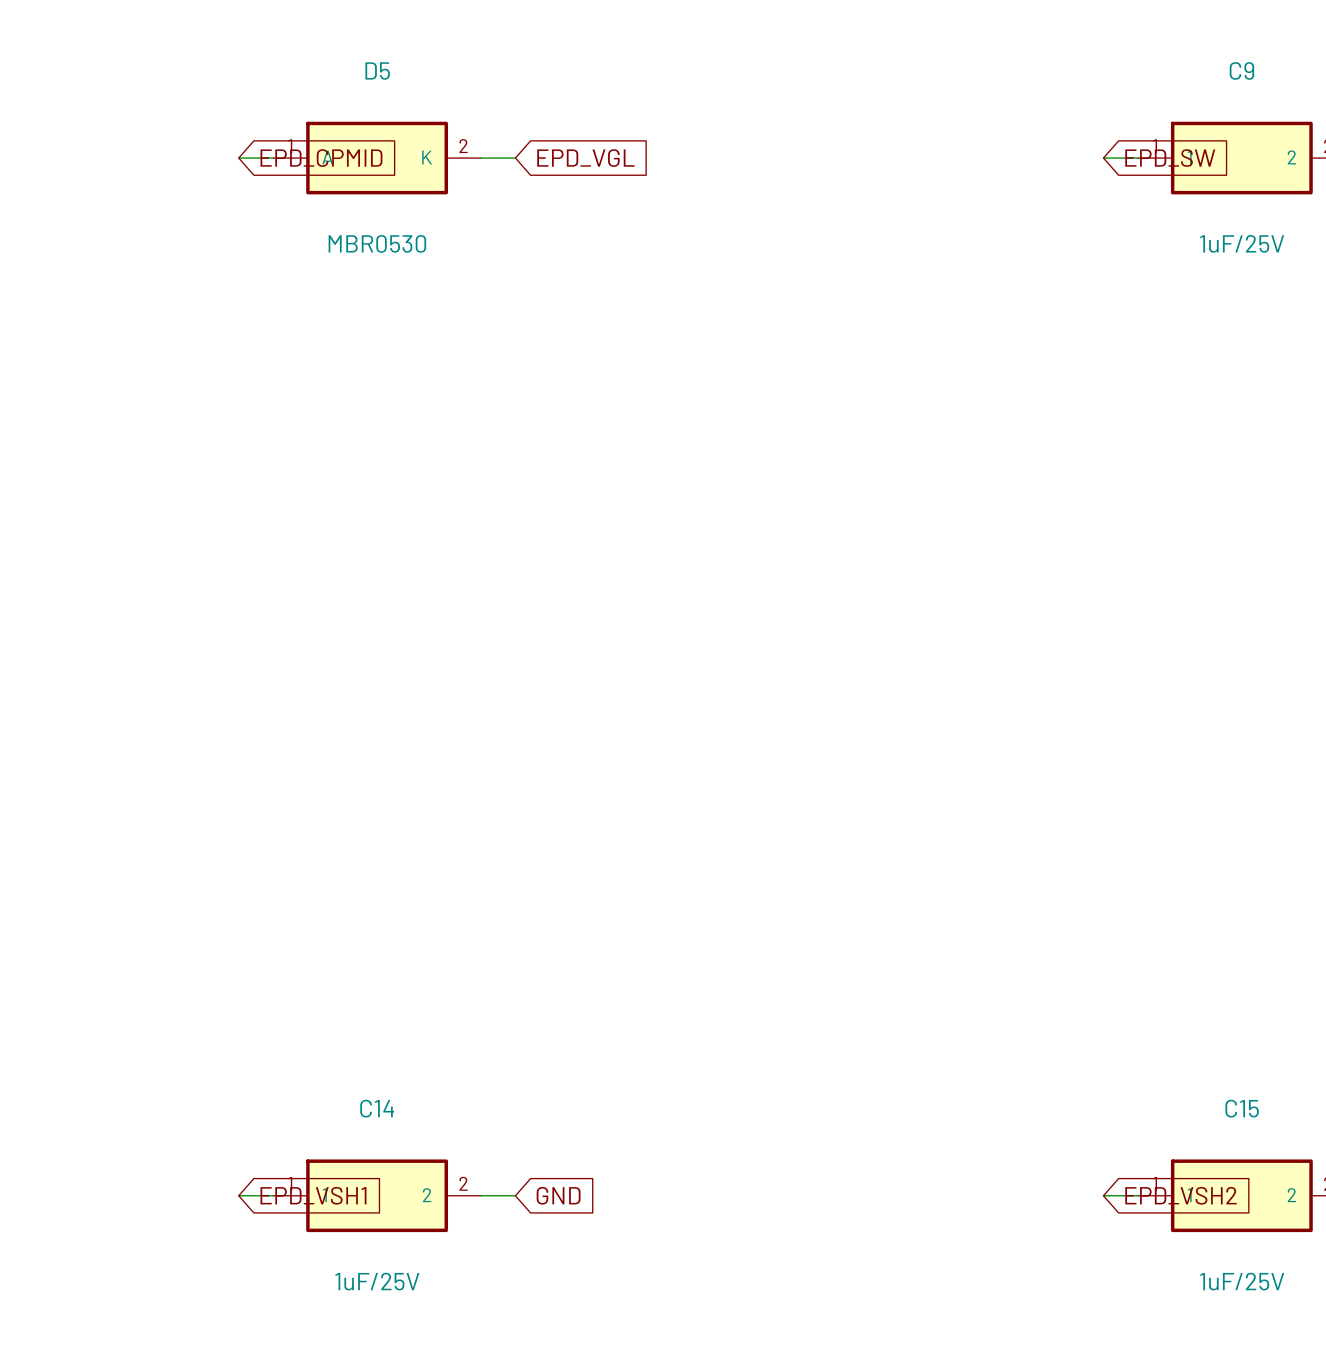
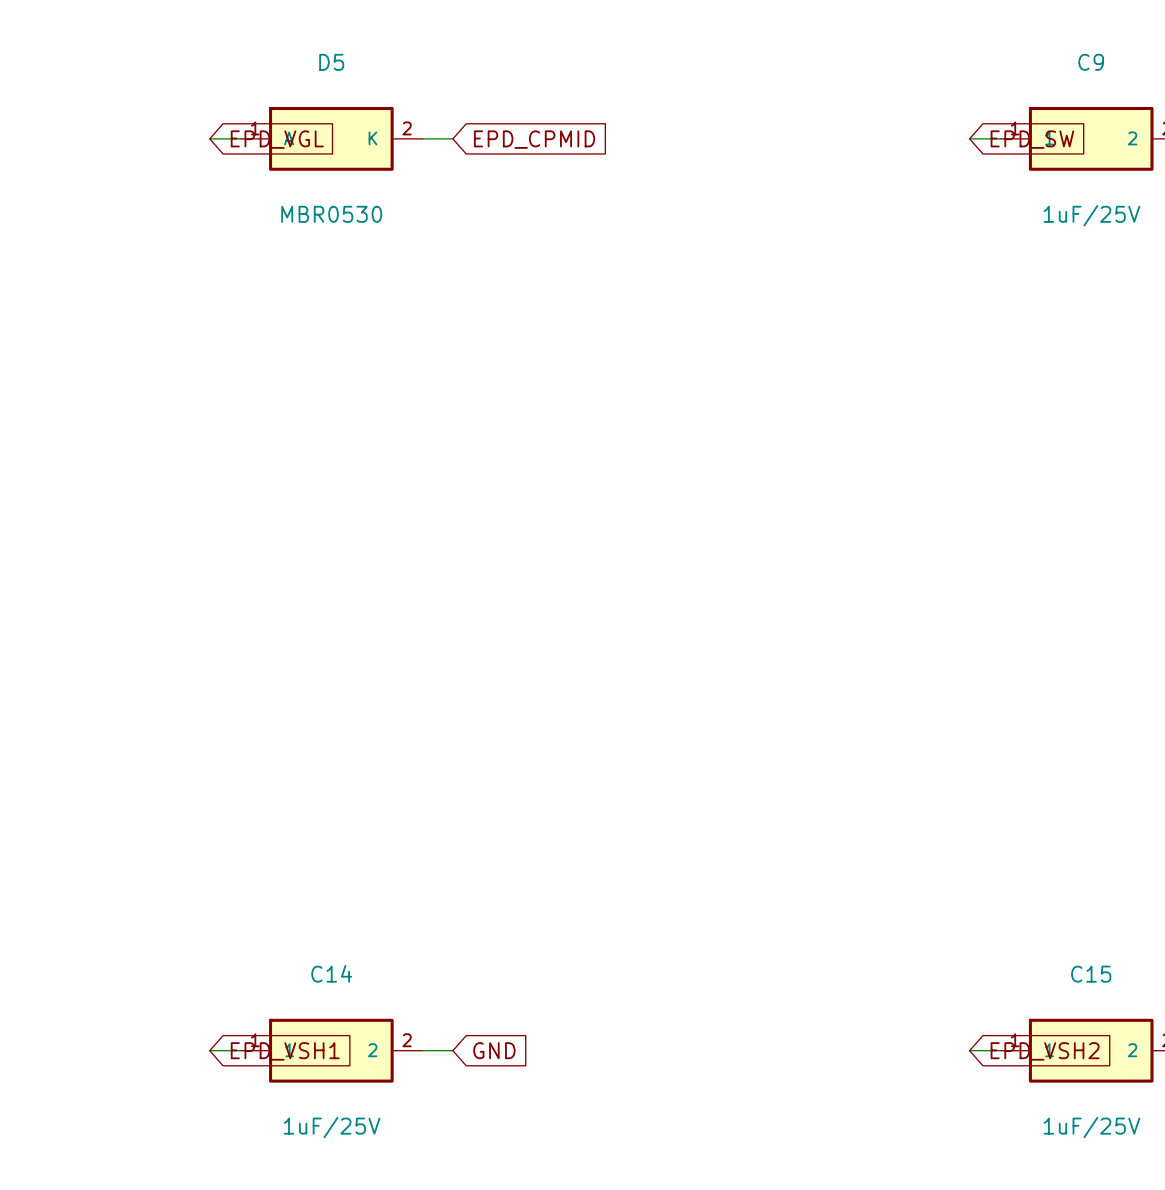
global label: EPD_CPMID (321, 158) -> EPD_VGL (277, 139)
global label: EPD_VGL (585, 158) -> EPD_CPMID (534, 139)

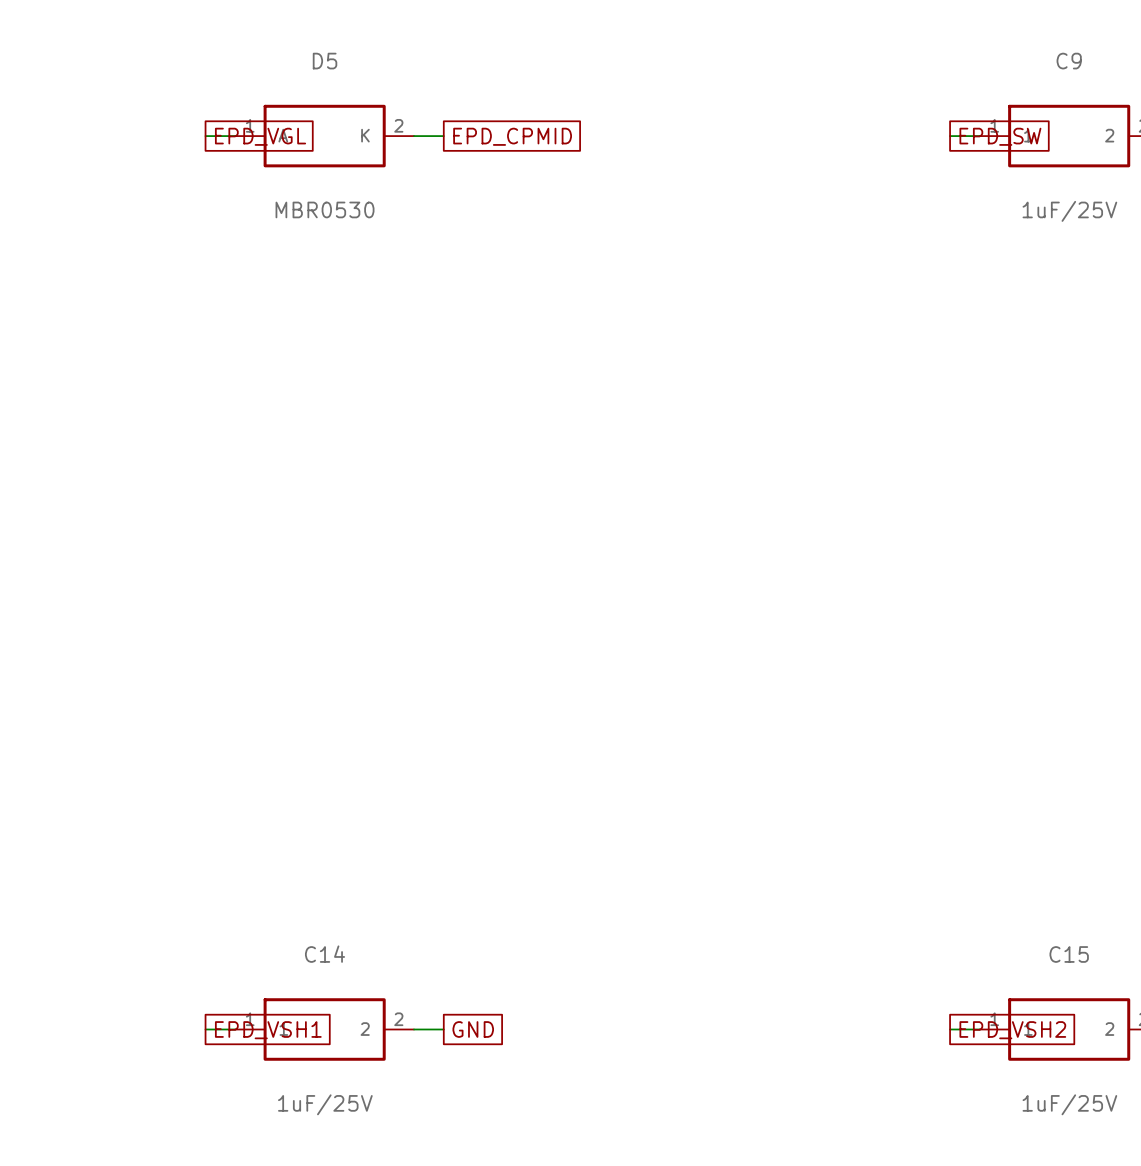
global label shape: input (277, 139) -> passive (260, 136)
global label shape: input (534, 139) -> passive (512, 136)
global label shape: input (1032, 139) -> passive (1000, 136)
global label shape: input (494, 1050) -> passive (473, 1029)
global label shape: input (285, 1051) -> passive (268, 1030)
global label shape: input (1045, 1051) -> passive (1012, 1030)

